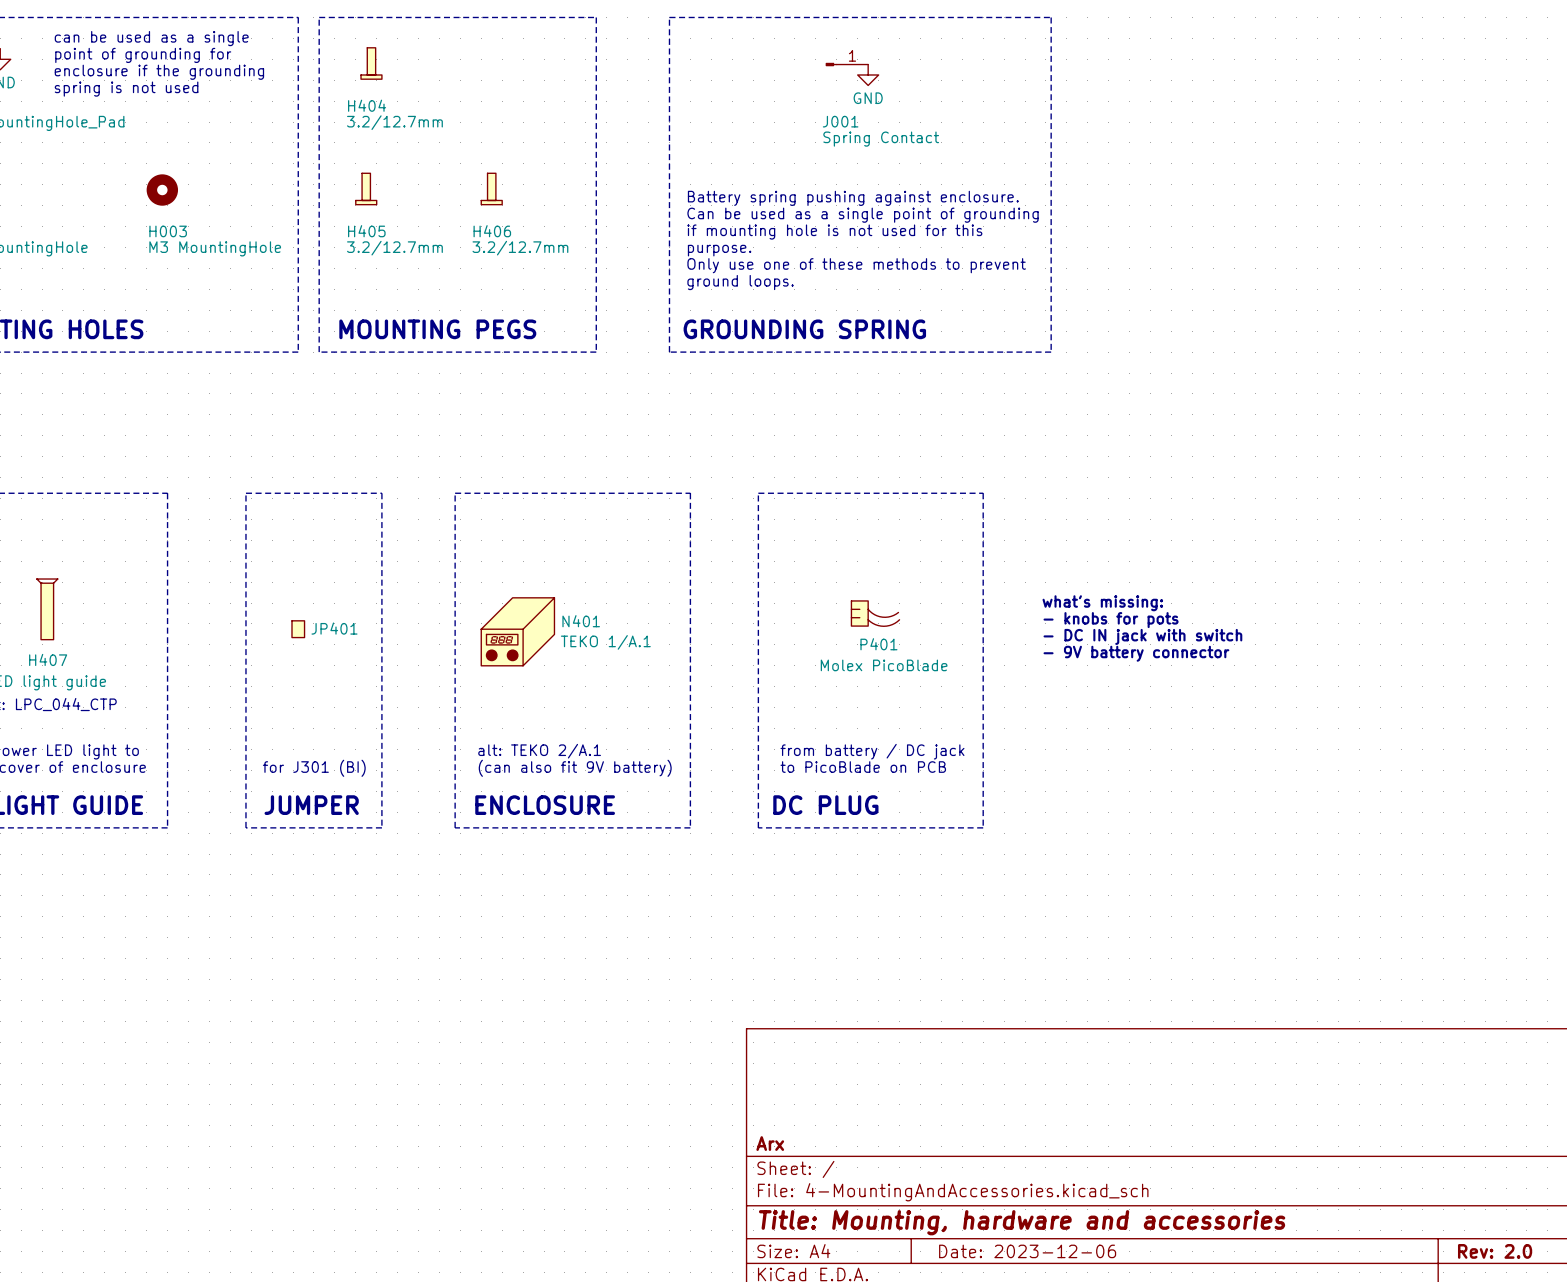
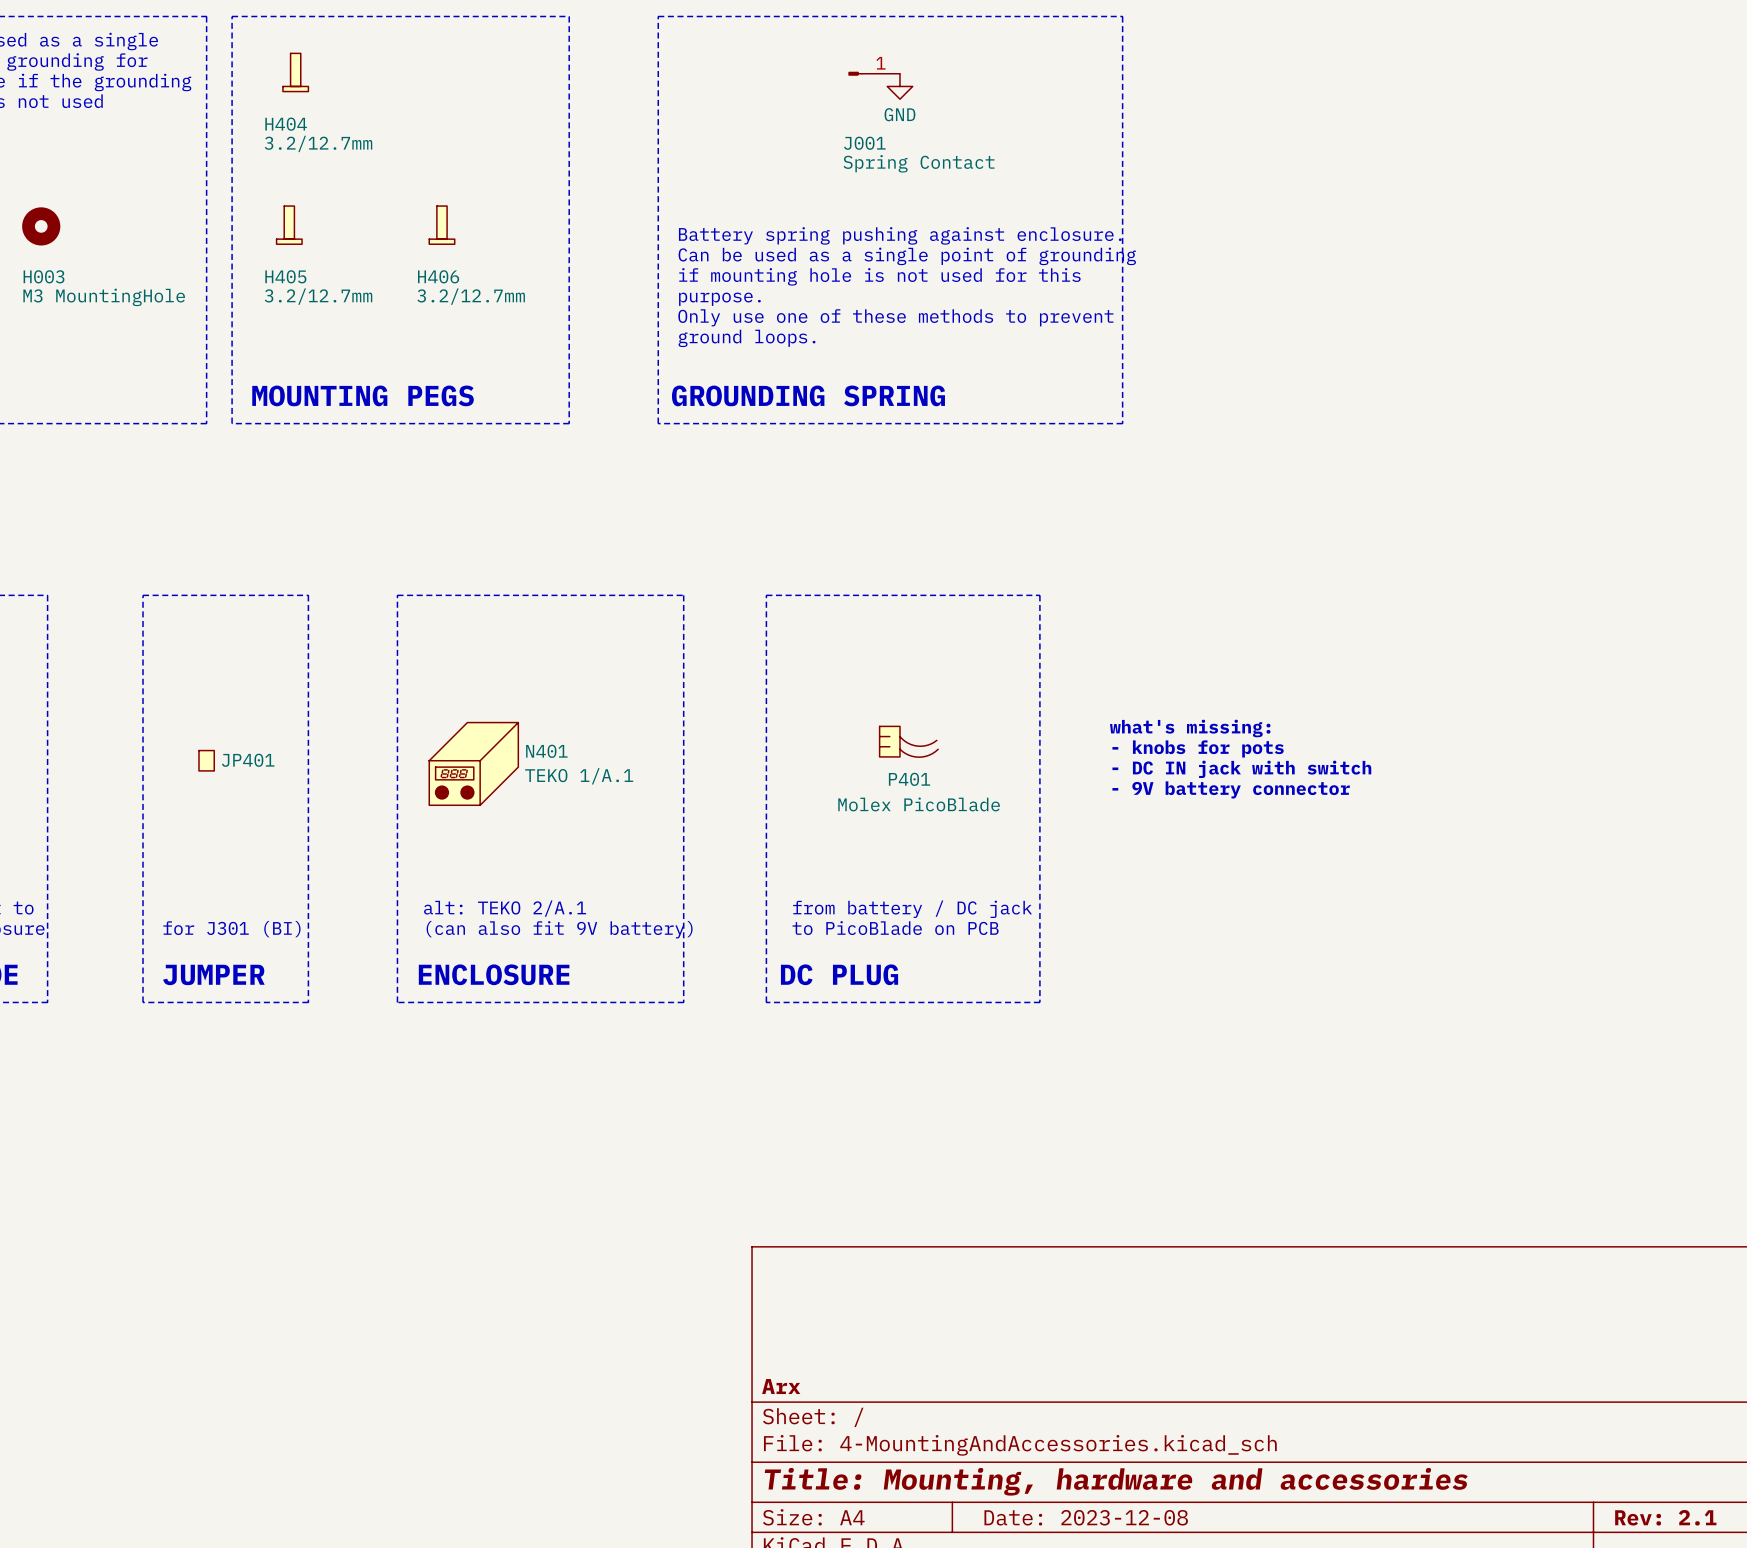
title block: Date: 2023-12-06 (1027, 1251) -> Date: 2023-12-08 (1086, 1517)
title block: Rev: 2.0 (1495, 1251) -> Rev: 2.1 (1665, 1517)

